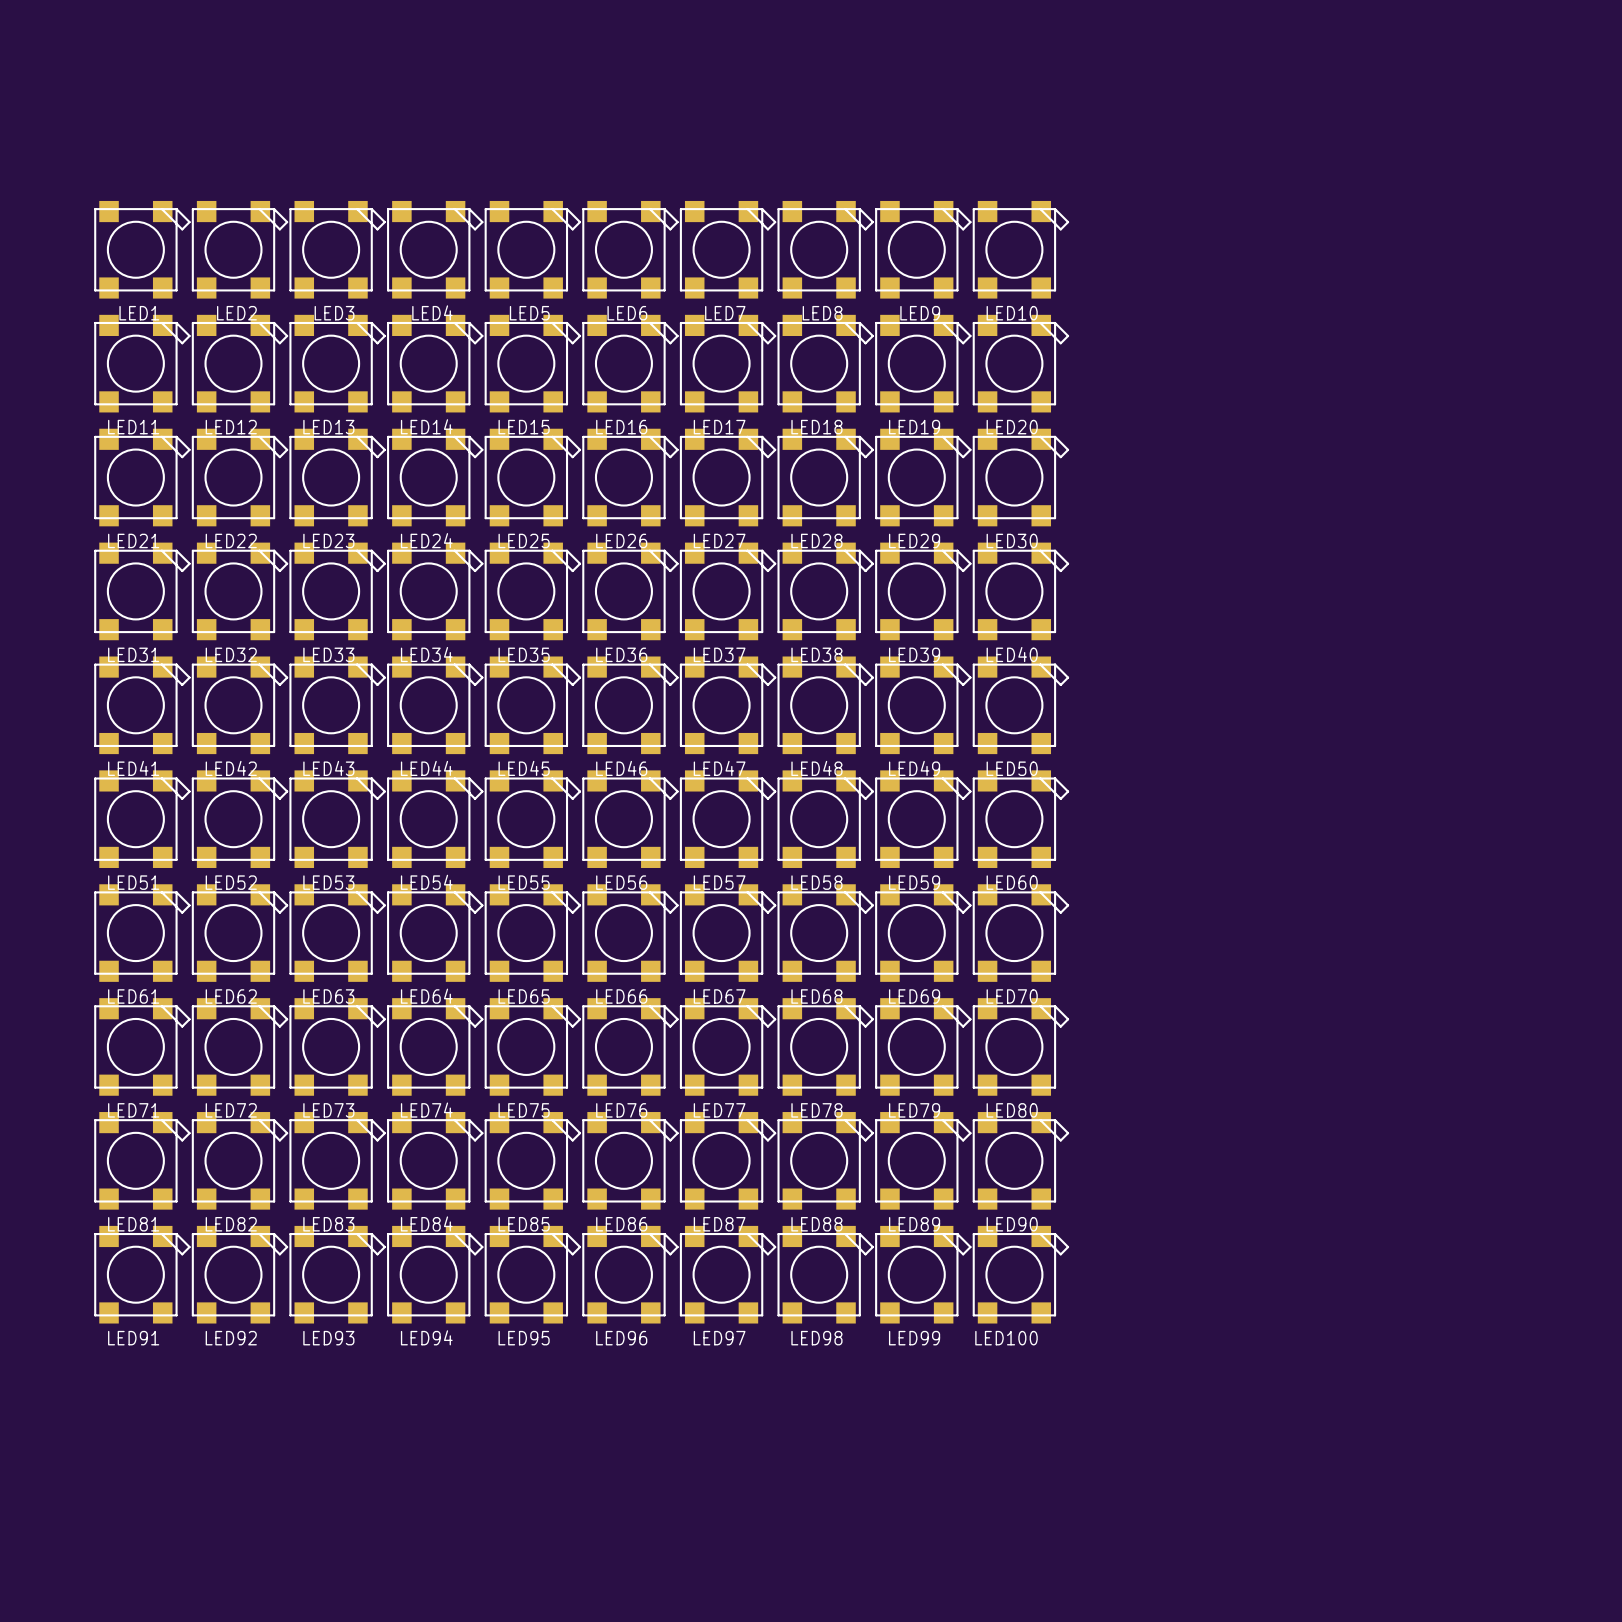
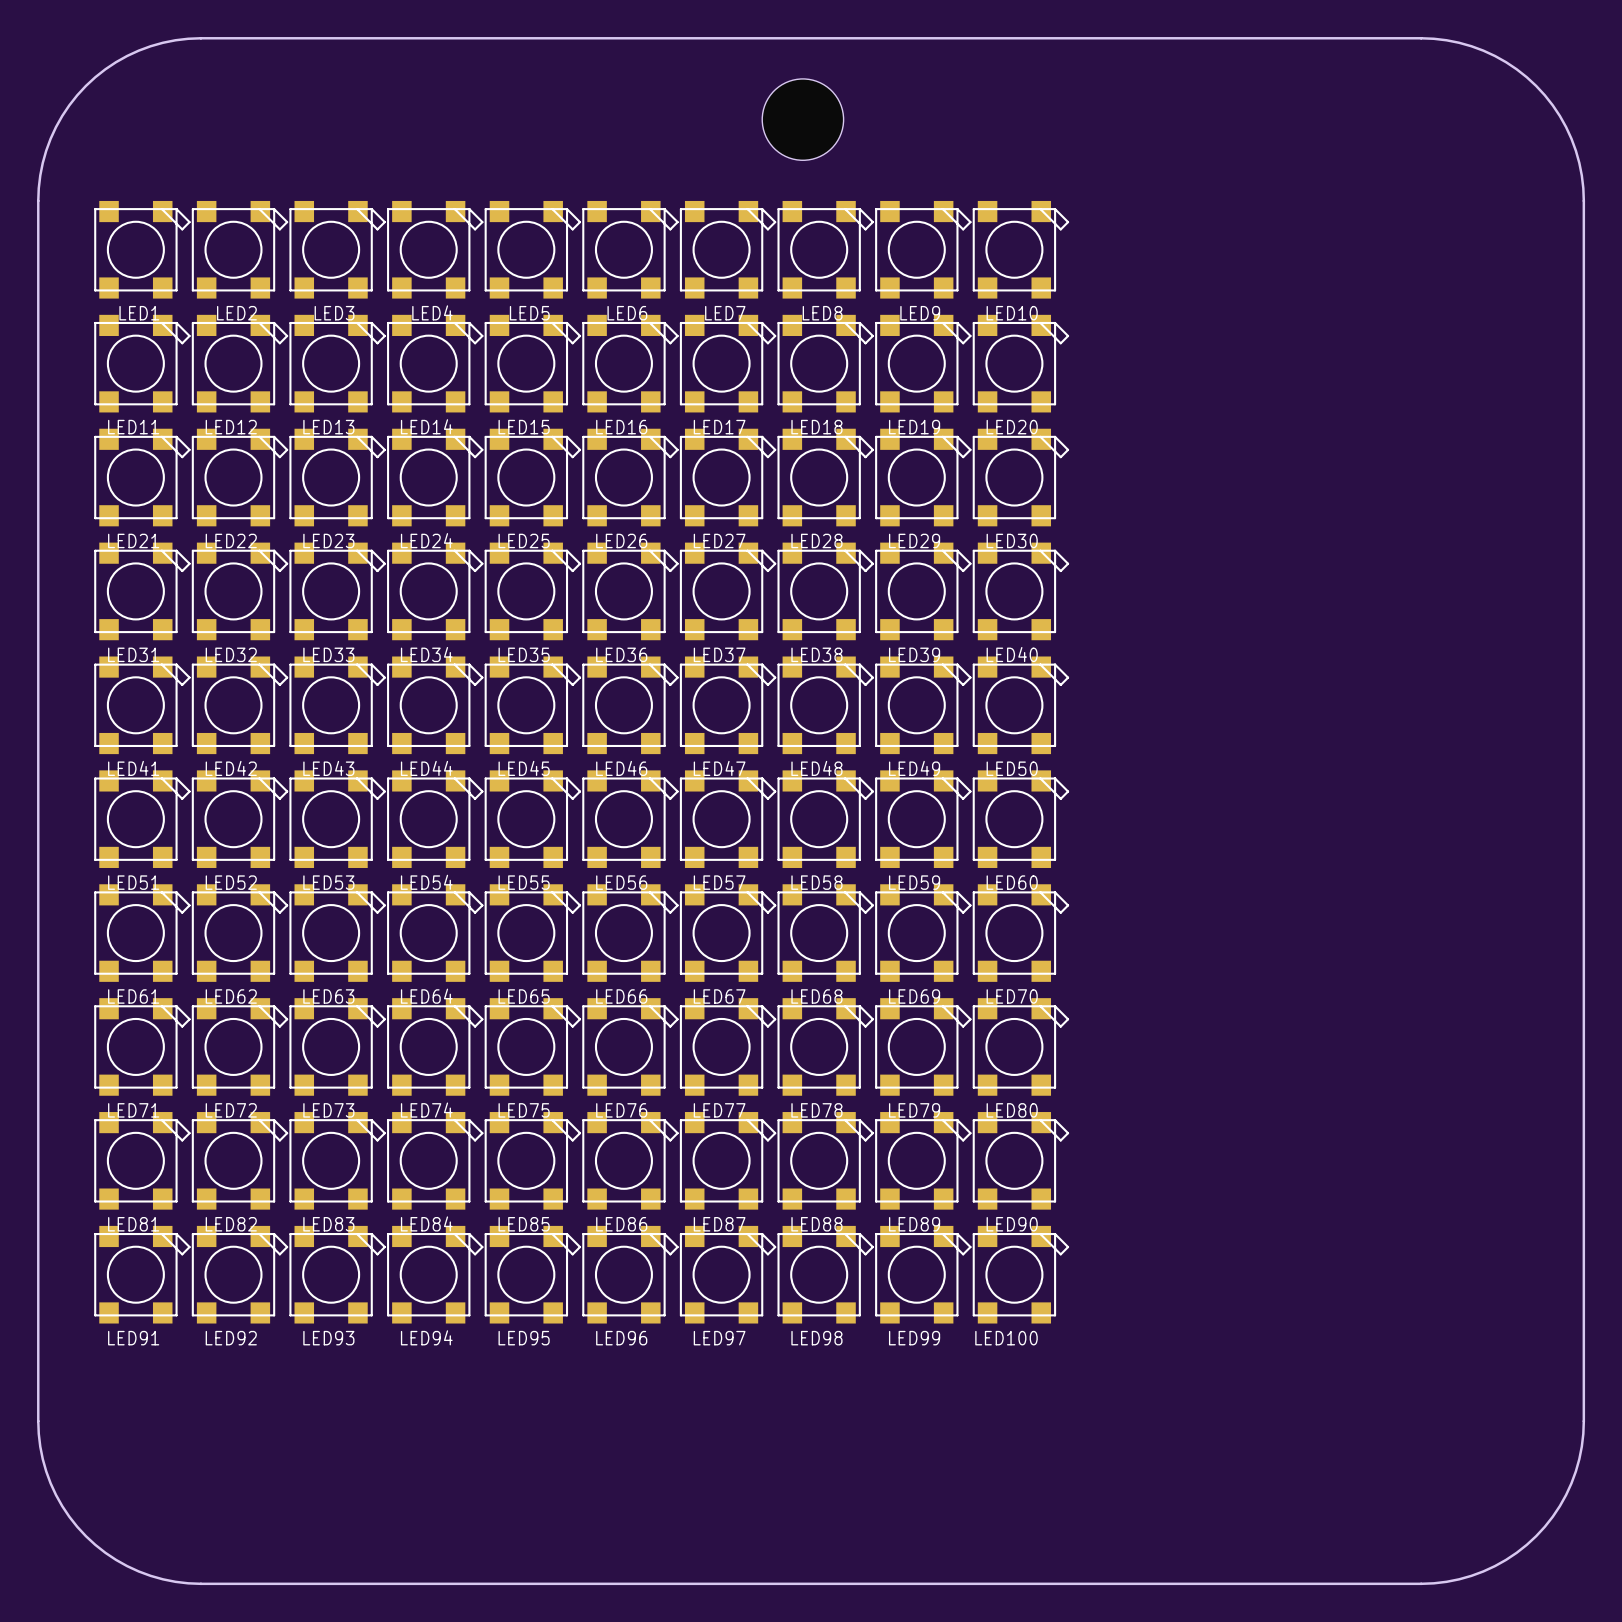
board edge: none -> (200, 38) (1433, 38) (1471, 46) (1494, 56) (1516, 69) (1544, 95) (1566, 127) (1575, 150) (1581, 175) (1583, 200) (1583, 1421) (1579, 1459) (1566, 1494) (1552, 1516) (1526, 1544) (1494, 1566) (1471, 1575) (1446, 1581) (1421, 1583) (200, 1583) (162, 1579) (127, 1566) (105, 1552) (77, 1526) (56, 1494) (46, 1471) (40, 1446) (38, 1421) (38, 188) (46, 150) (56, 127) (69, 105) (85, 85) (105, 69) (138, 50) (162, 42) (200, 38)
hole: none -> (802, 119)

